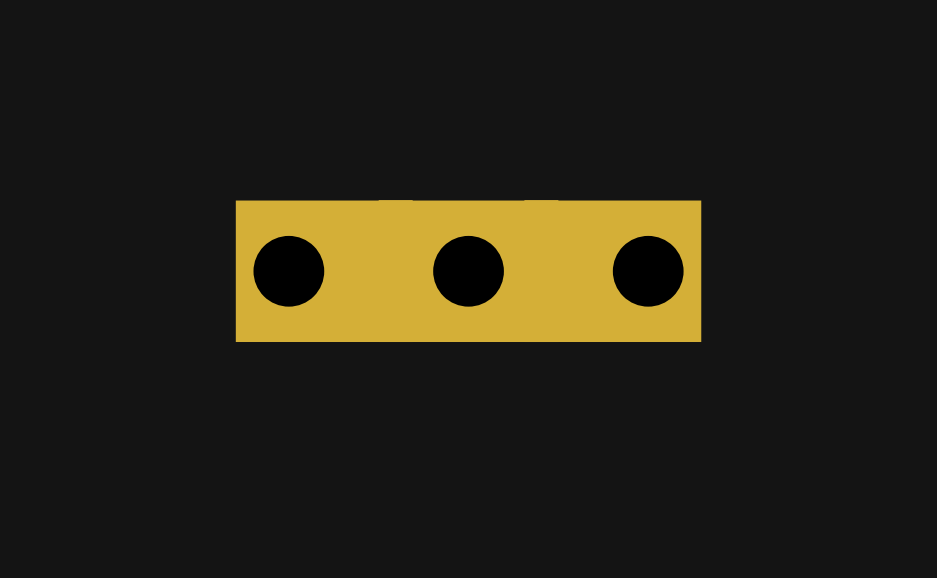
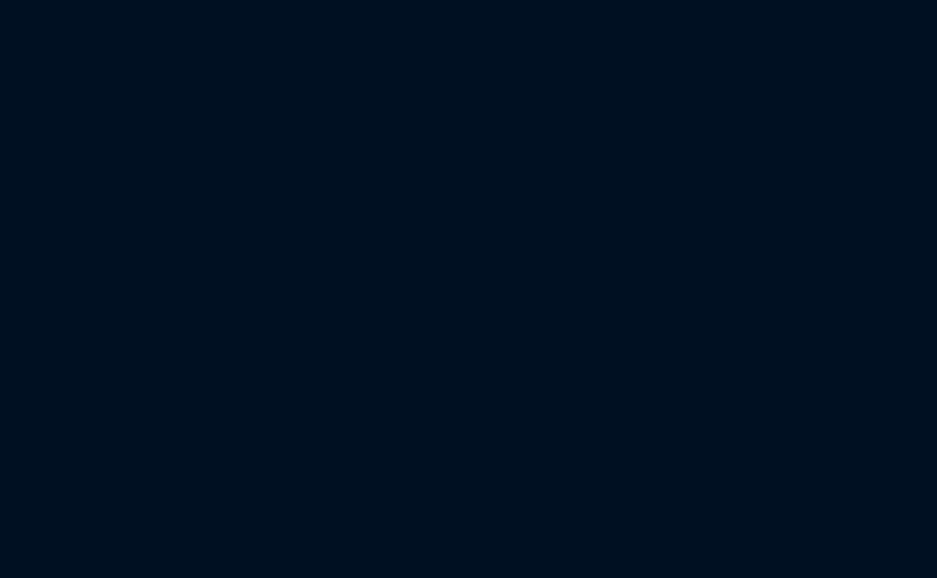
part: (468, 271) -> none

